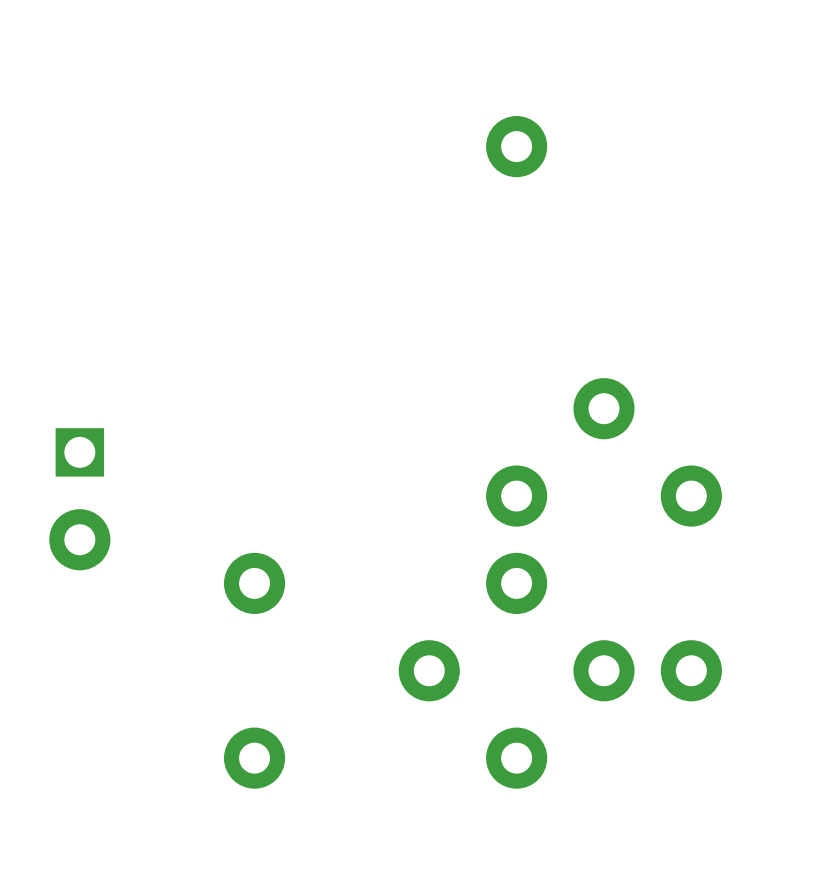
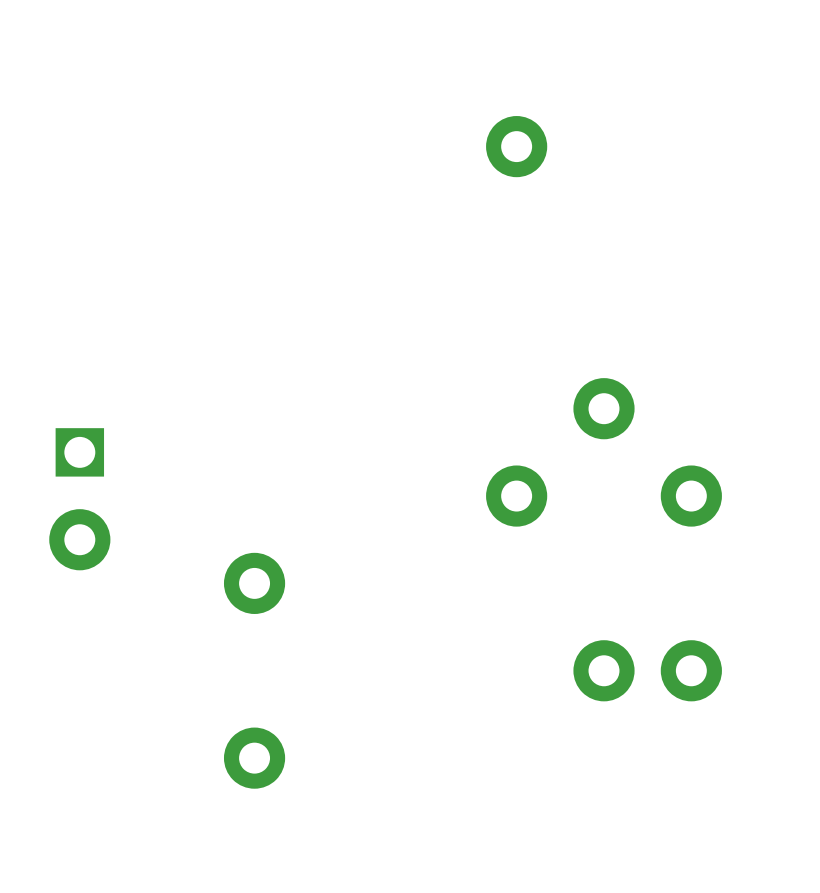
part: (472, 670) -> none

